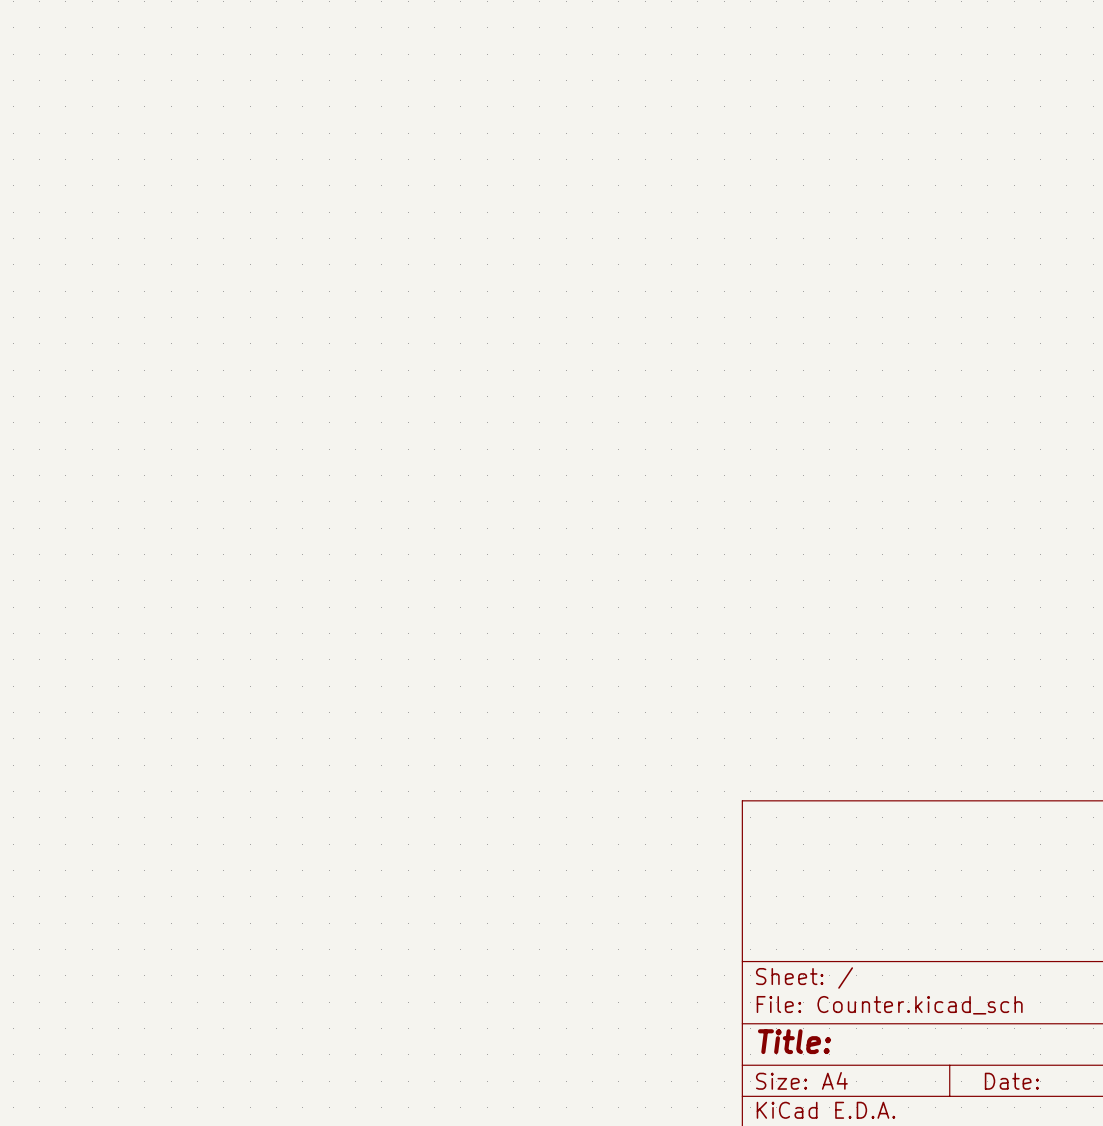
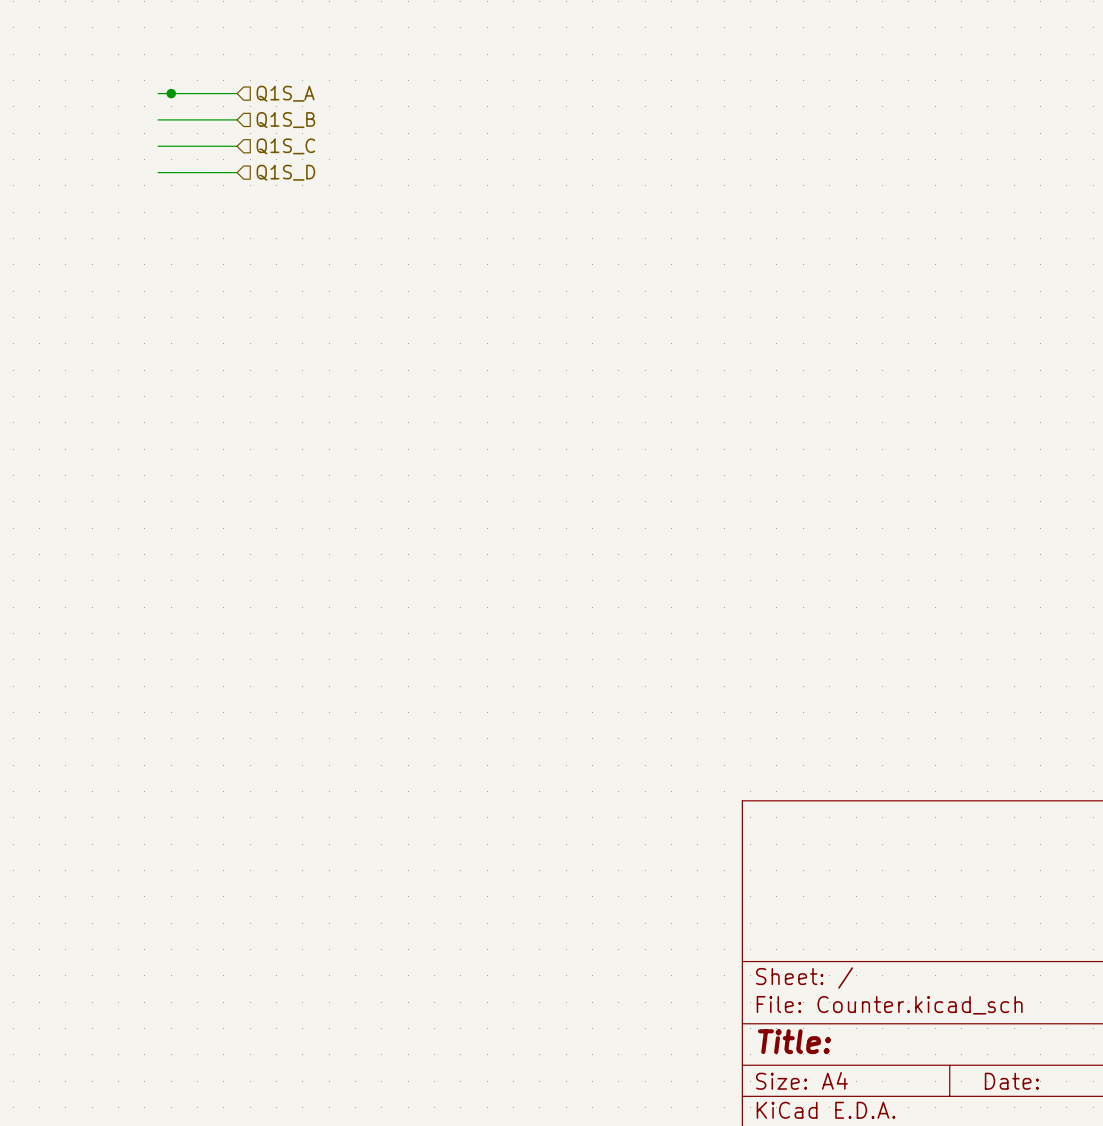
wire: none -> (158, 93) (237, 93)
junction: none -> (171, 93)
hierarchical label: none -> Q1S_A (285, 93)
wire: none -> (158, 119) (237, 119)
hierarchical label: none -> Q1S_B (285, 120)
wire: none -> (158, 146) (237, 146)
hierarchical label: none -> Q1S_C (285, 146)
wire: none -> (158, 172) (237, 172)
hierarchical label: none -> Q1S_D (285, 172)

